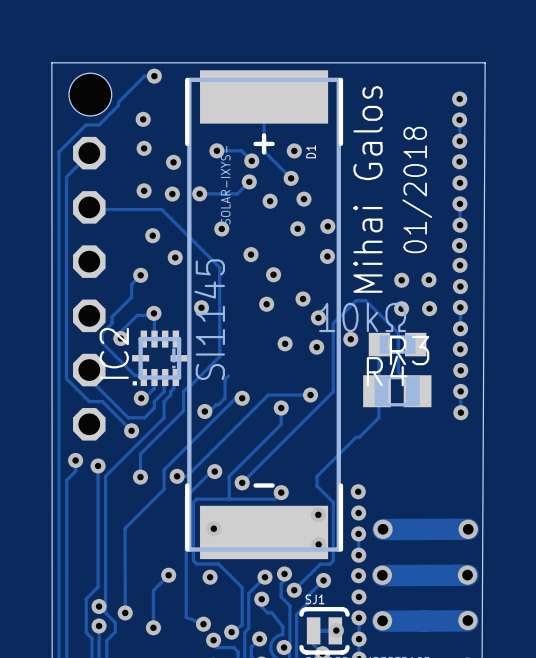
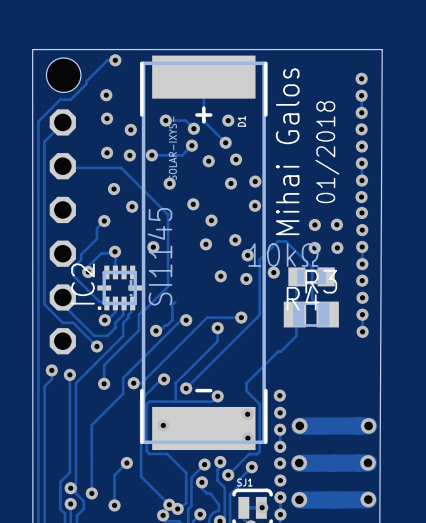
via: (210, 577) -> none
track: (186, 591) (186, 617) (203, 624) -> (141, 476) (169, 504)
via position: (203, 624) -> (169, 504)

